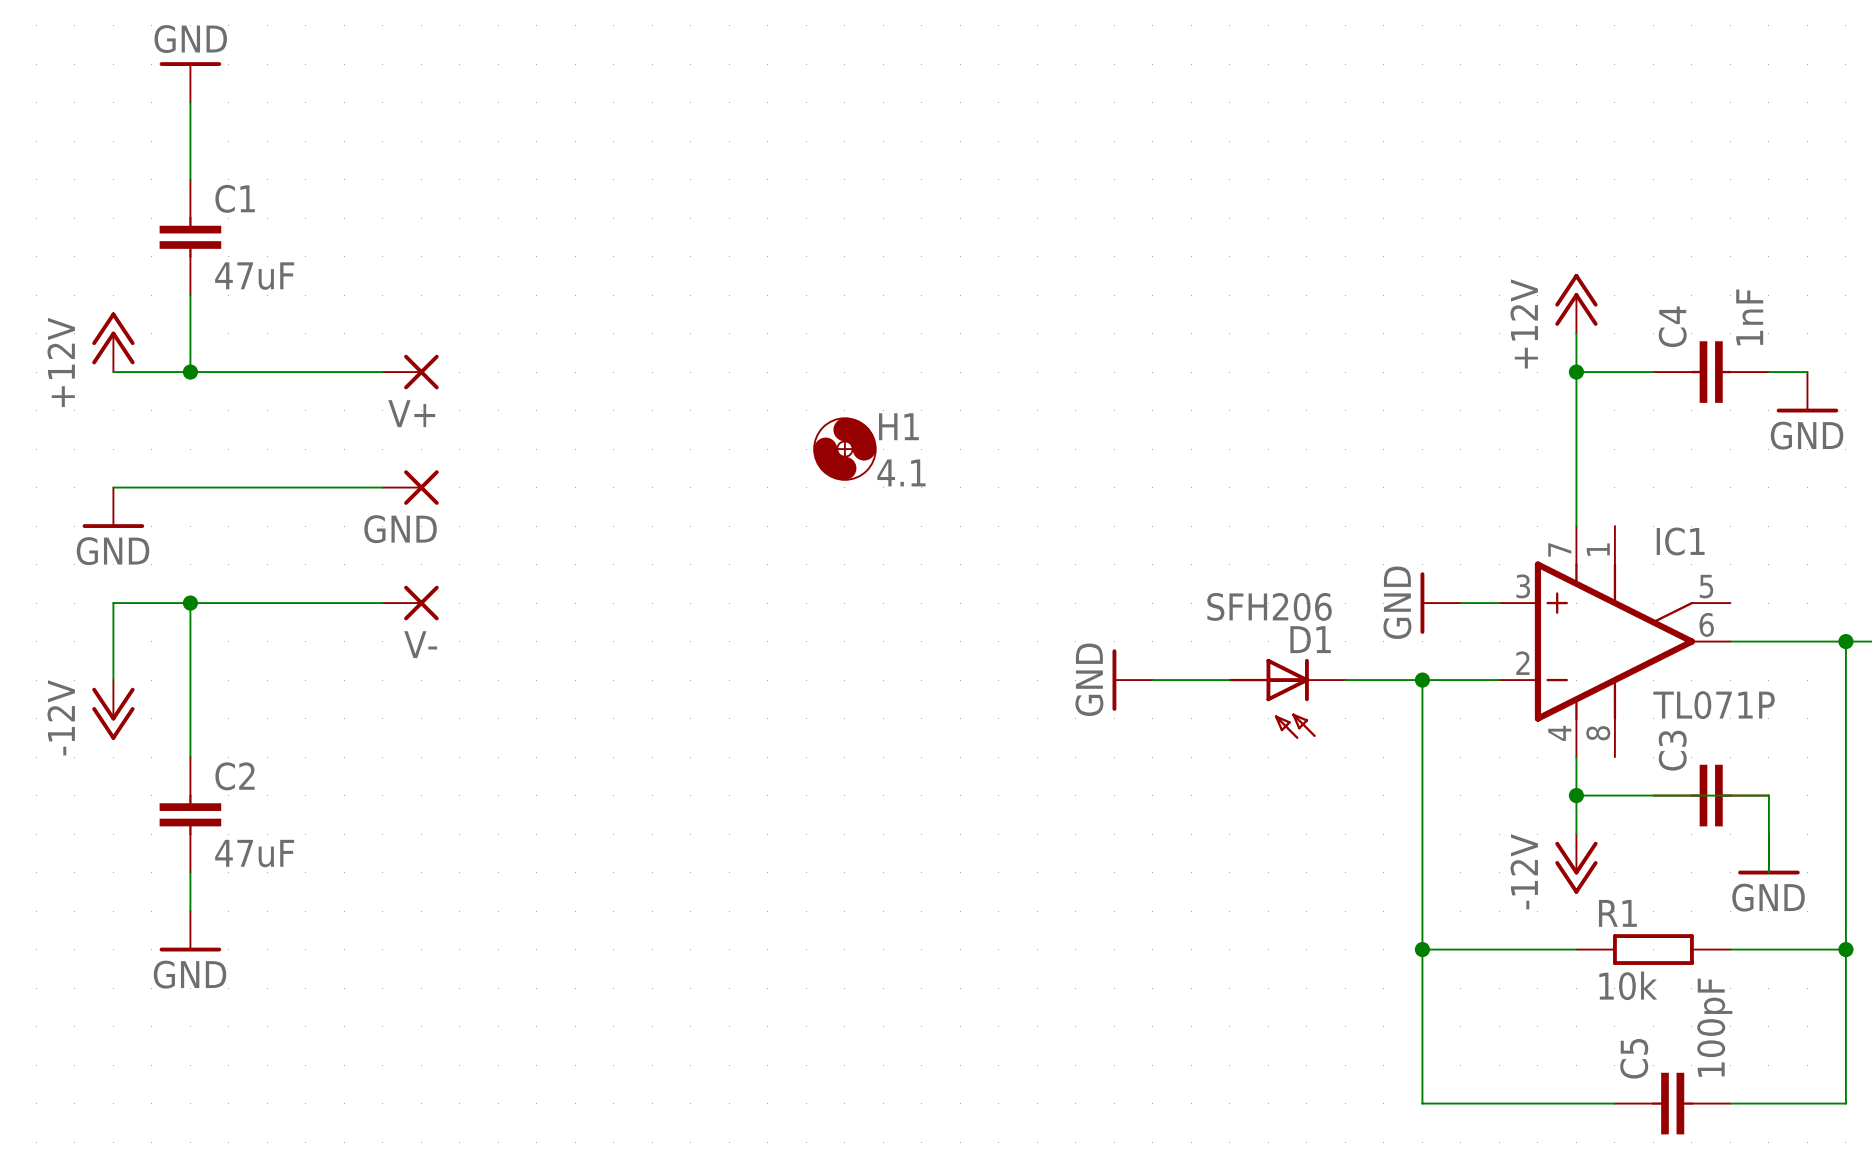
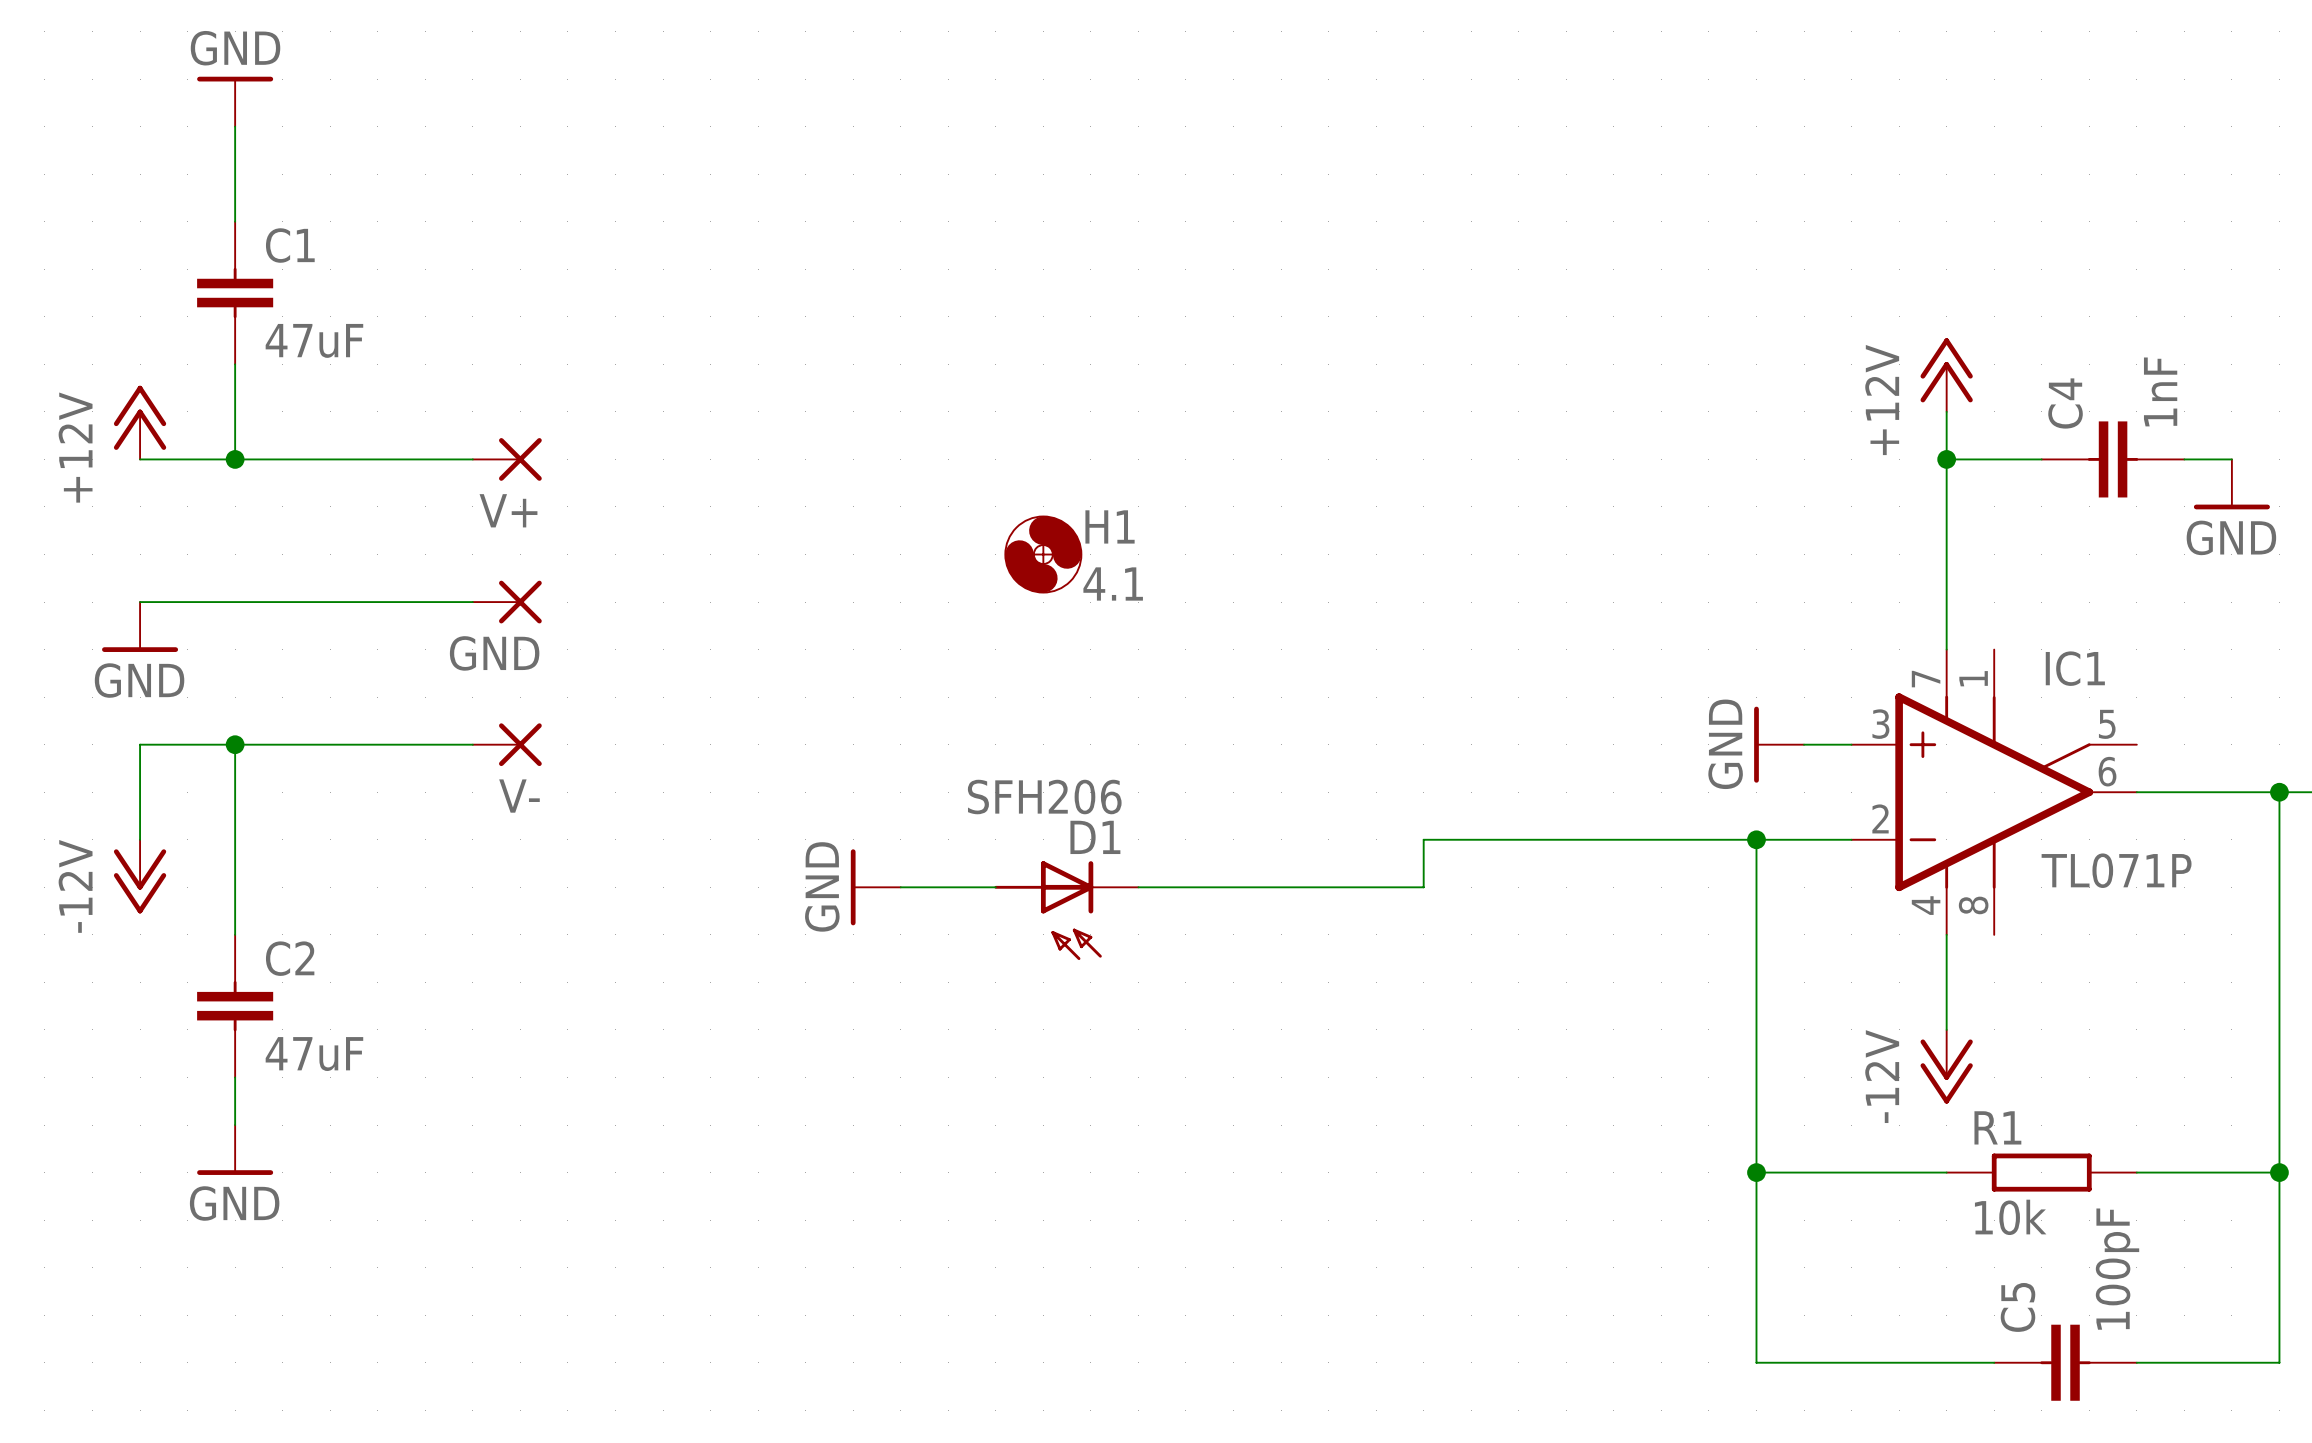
power symbol: GND (1132, 680) -> none
wire: none -> (1423, 839) (1423, 887) (1138, 887)
D1 position: (1287, 698) -> (1066, 910)
power symbol: none -> GND (875, 887)
wire: none -> (900, 887) (995, 887)
wire: (1576, 795) (1768, 795) (1768, 872) -> none
junction: (1576, 795) -> none
C3: (1711, 795) -> none
power symbol: GND (1768, 854) -> none

